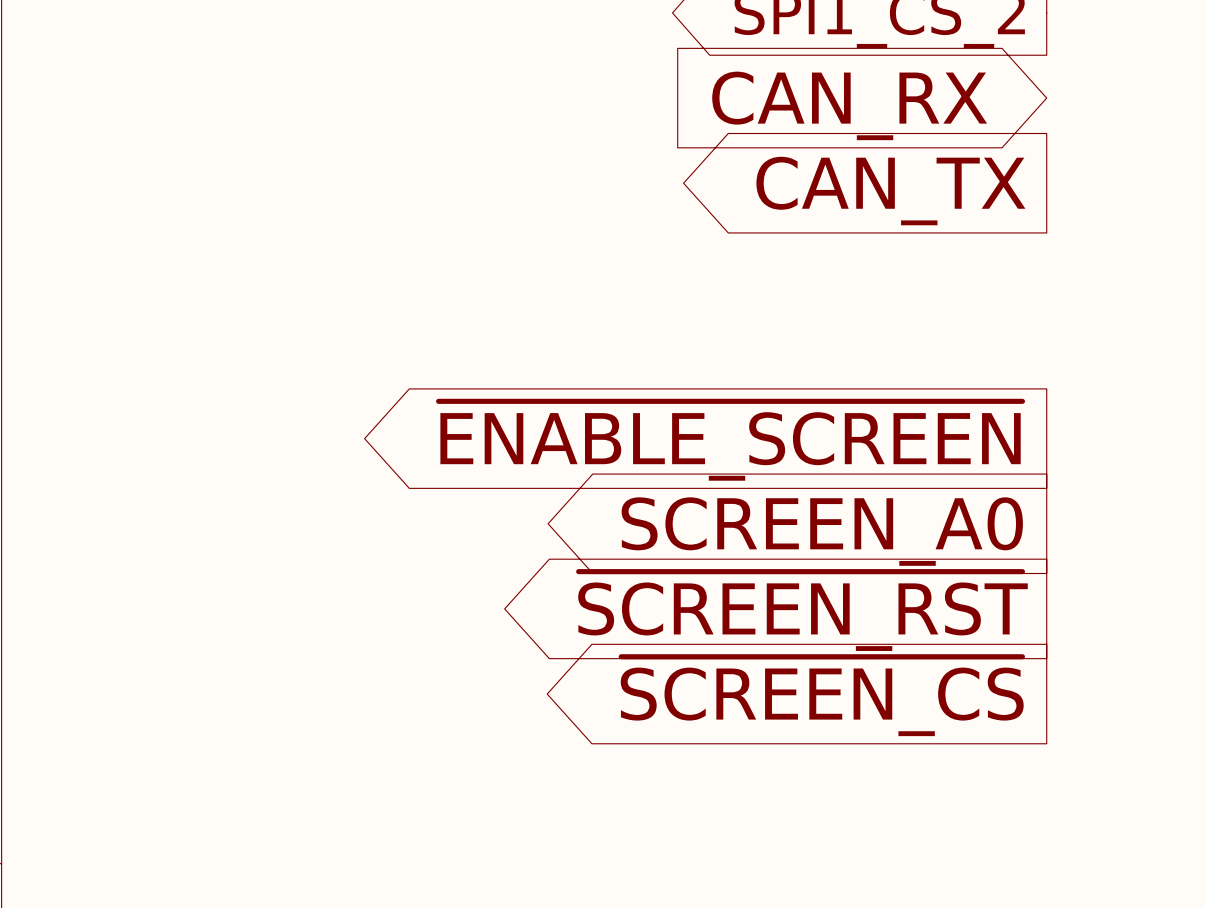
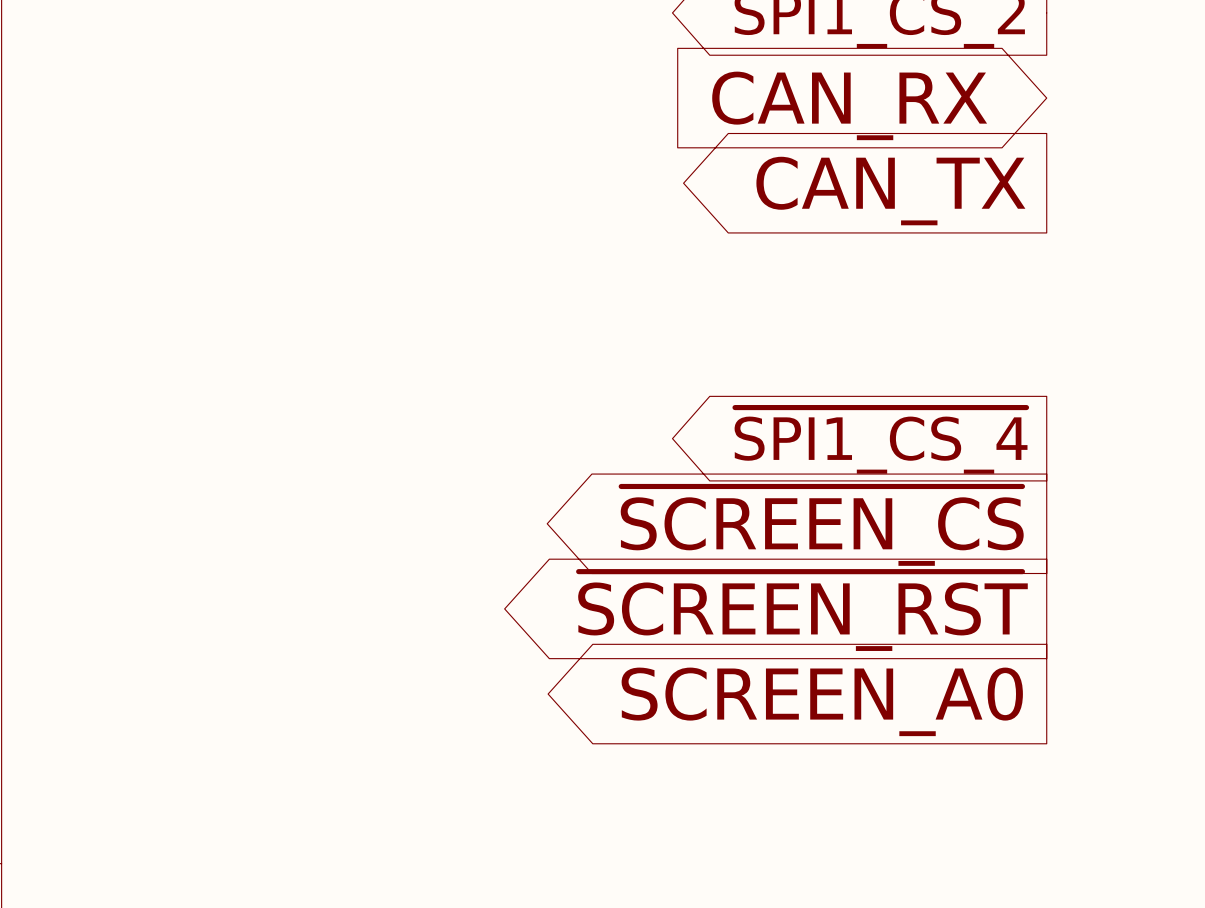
global label: ~{ENABLE_SCREEN} (730, 441) -> ~{SPI1_CS_4} (881, 440)
global label: SCREEN_A0 (822, 531) -> ~{SCREEN_CS} (822, 526)
global label: ~{SCREEN_CS} (822, 696) -> SCREEN_A0 (822, 701)

